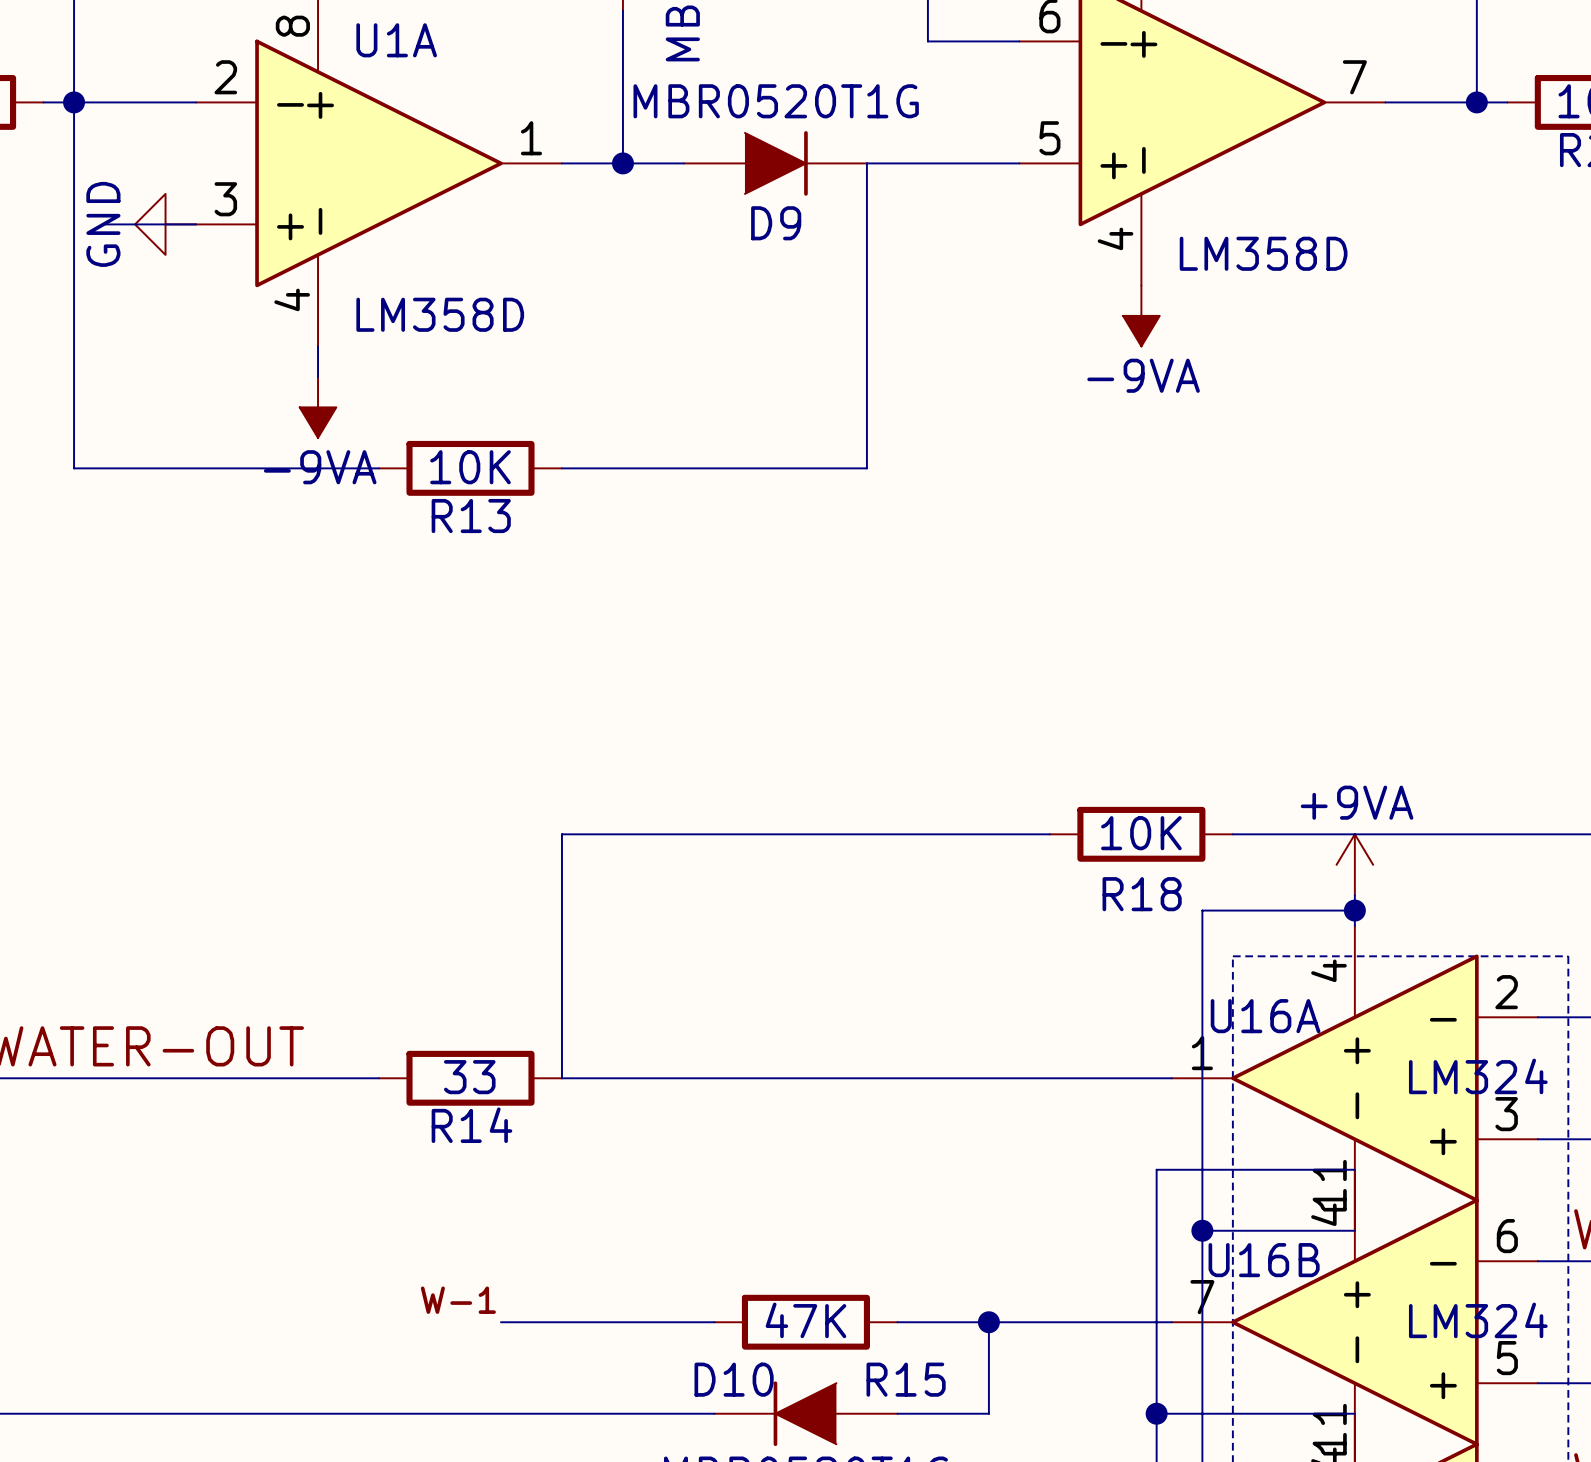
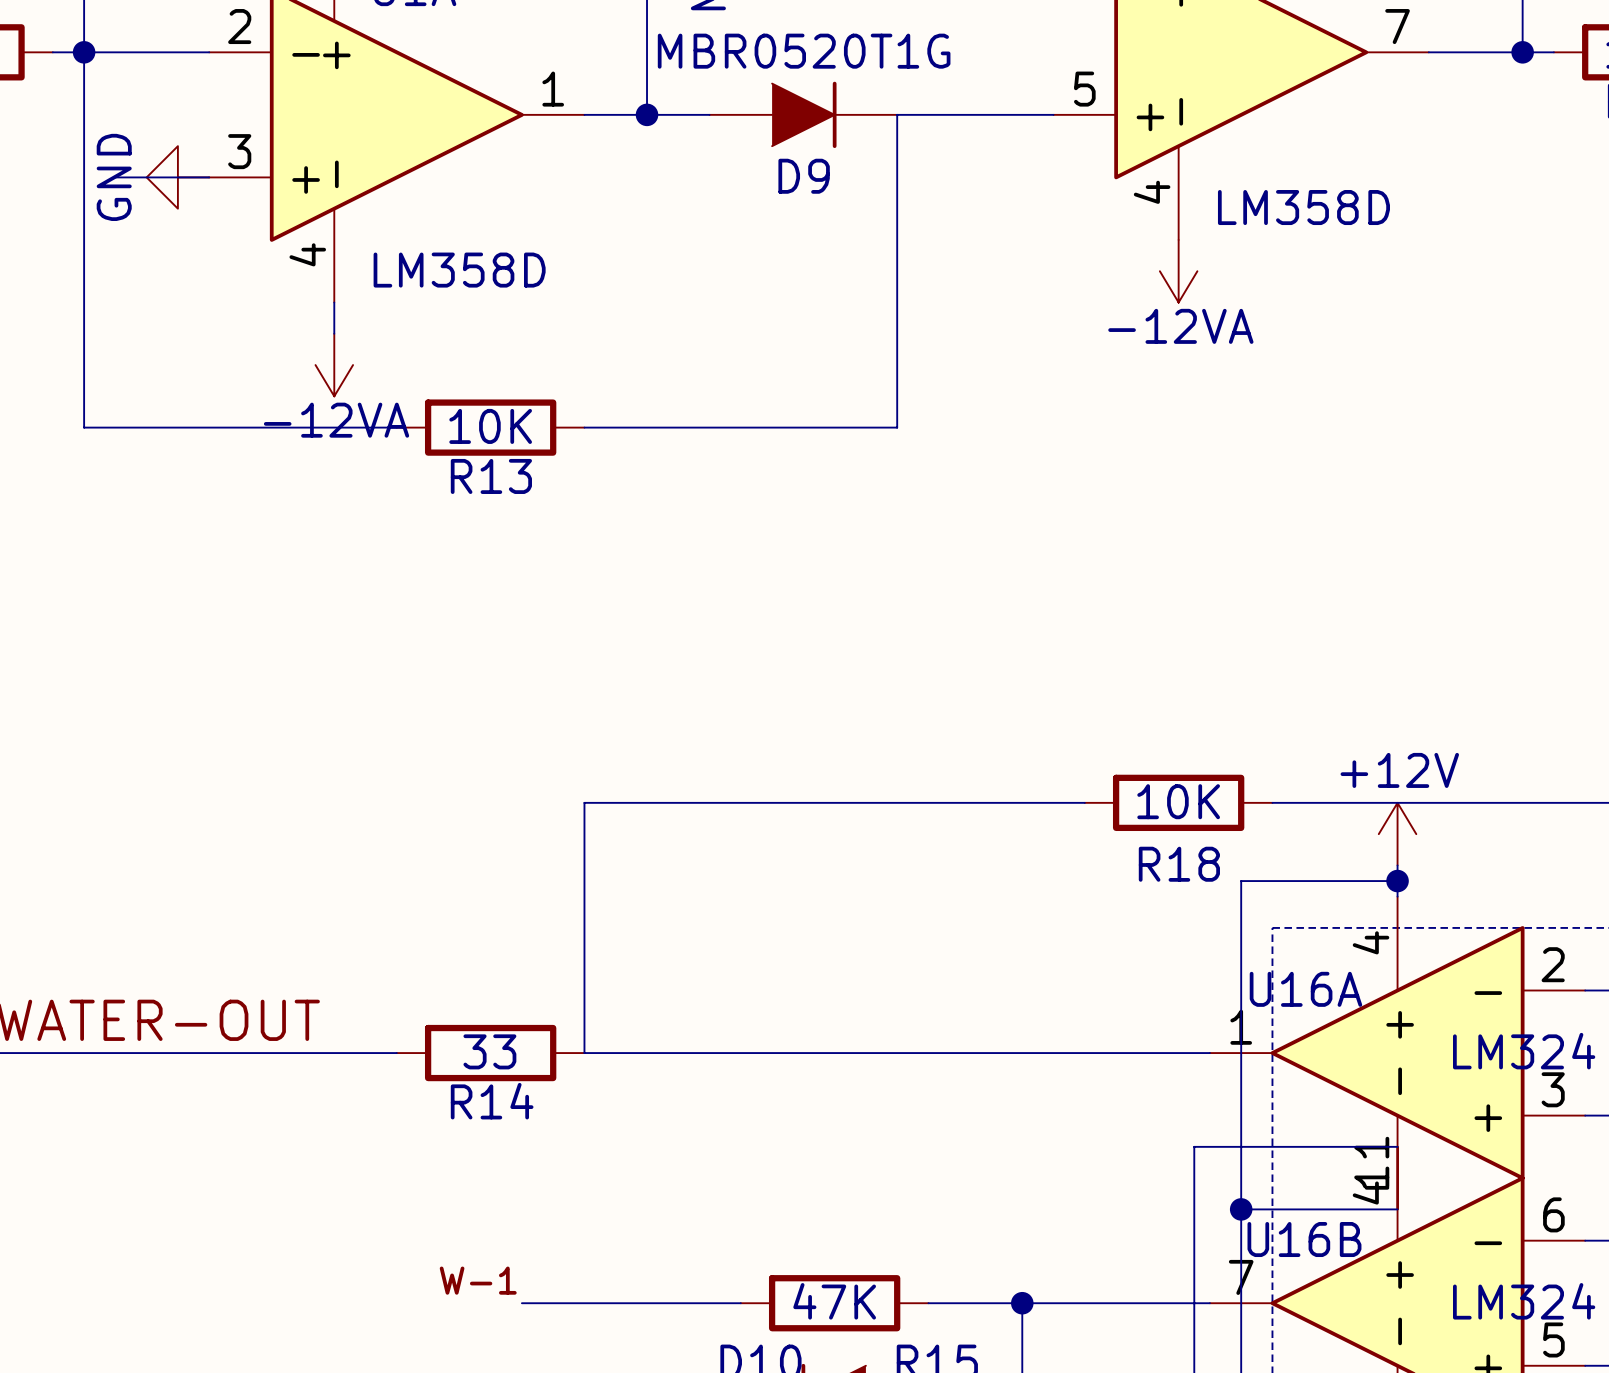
power symbol: -9VA (1141, 315) -> -12VA (1178, 271)
power symbol: -9VA (318, 407) -> -12VA (334, 365)
power symbol: +9VA (1354, 864) -> +12V (1397, 834)

